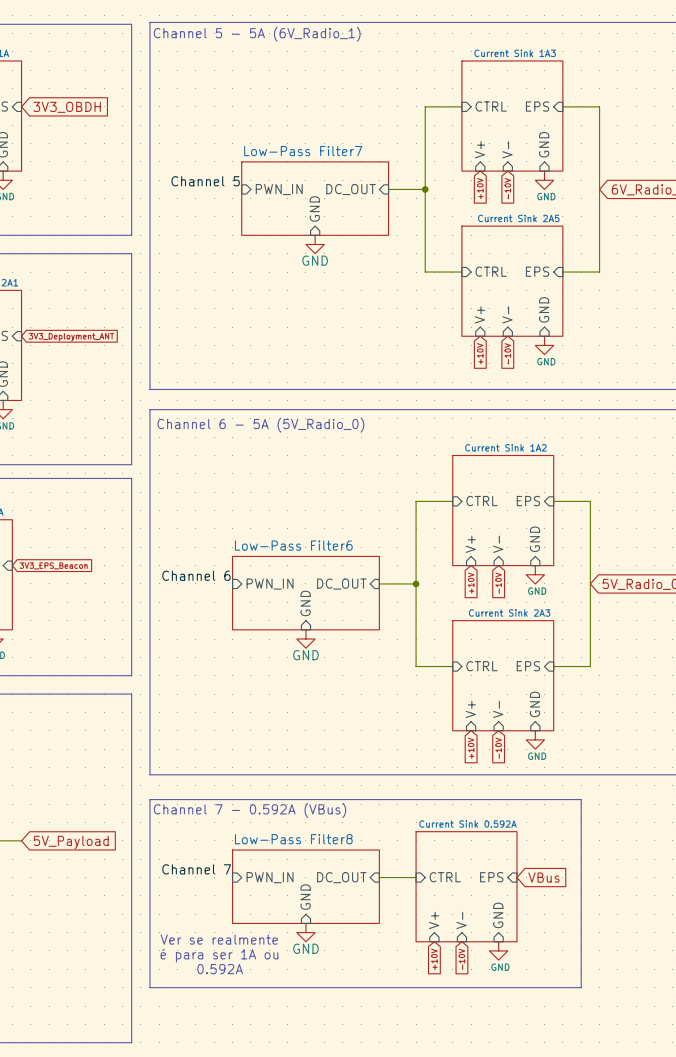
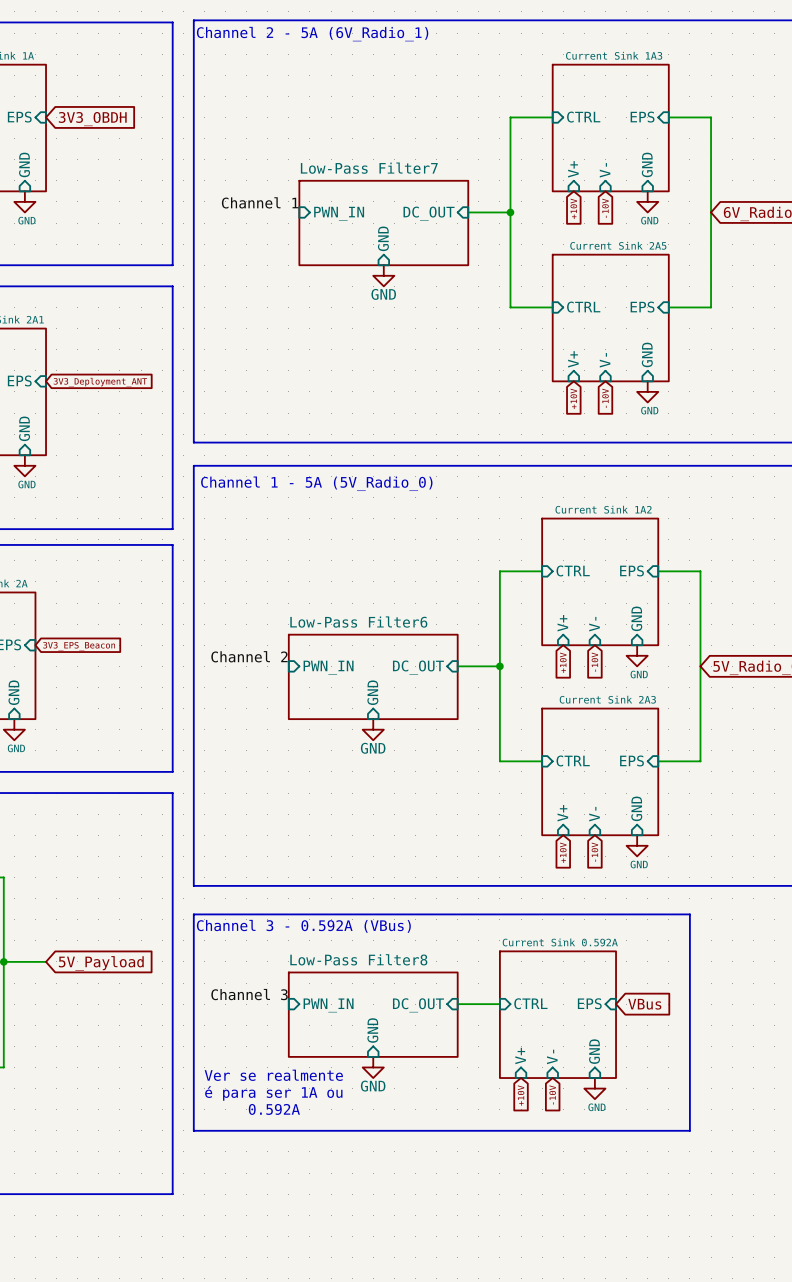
text: Channel 5 - 5A (6V_Radio_1) (257, 34) -> Channel 2 - 5A (6V_Radio_1) (312, 34)
label: Channel 5 (205, 181) -> Channel 1 (260, 202)
text: Channel 6 - 5A (5V_Radio_0) (260, 425) -> Channel 1 - 5A (5V_Radio_0) (316, 483)
label: Channel 6 (196, 575) -> Channel 2 (249, 656)
text: Channel 7 - 0.592A (VBus) (249, 810) -> Channel 3 - 0.592A (VBus) (303, 926)
label: Channel 7 (196, 869) -> Channel 3 (249, 994)

